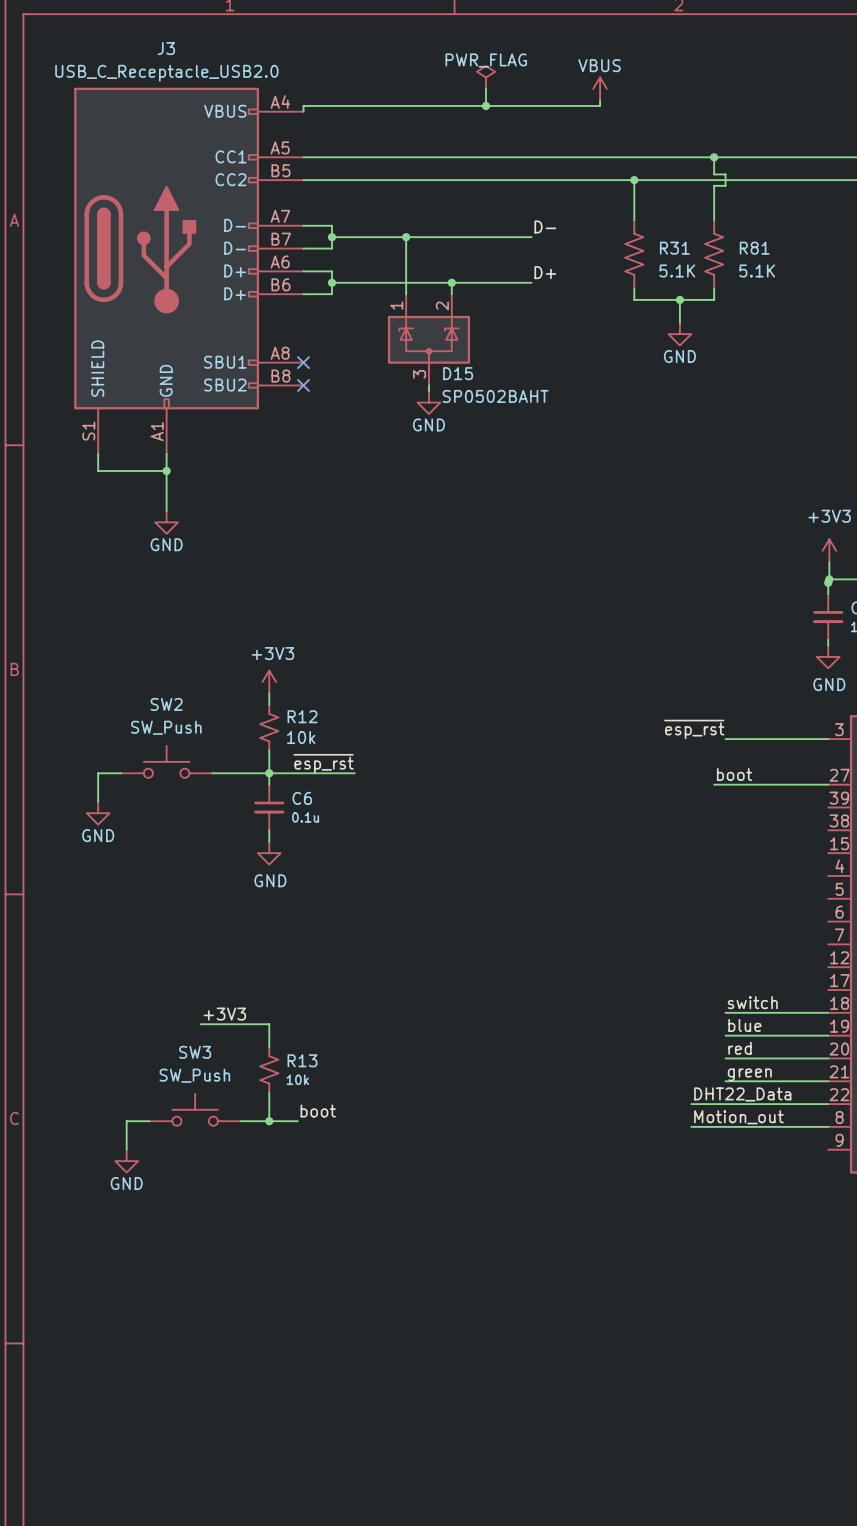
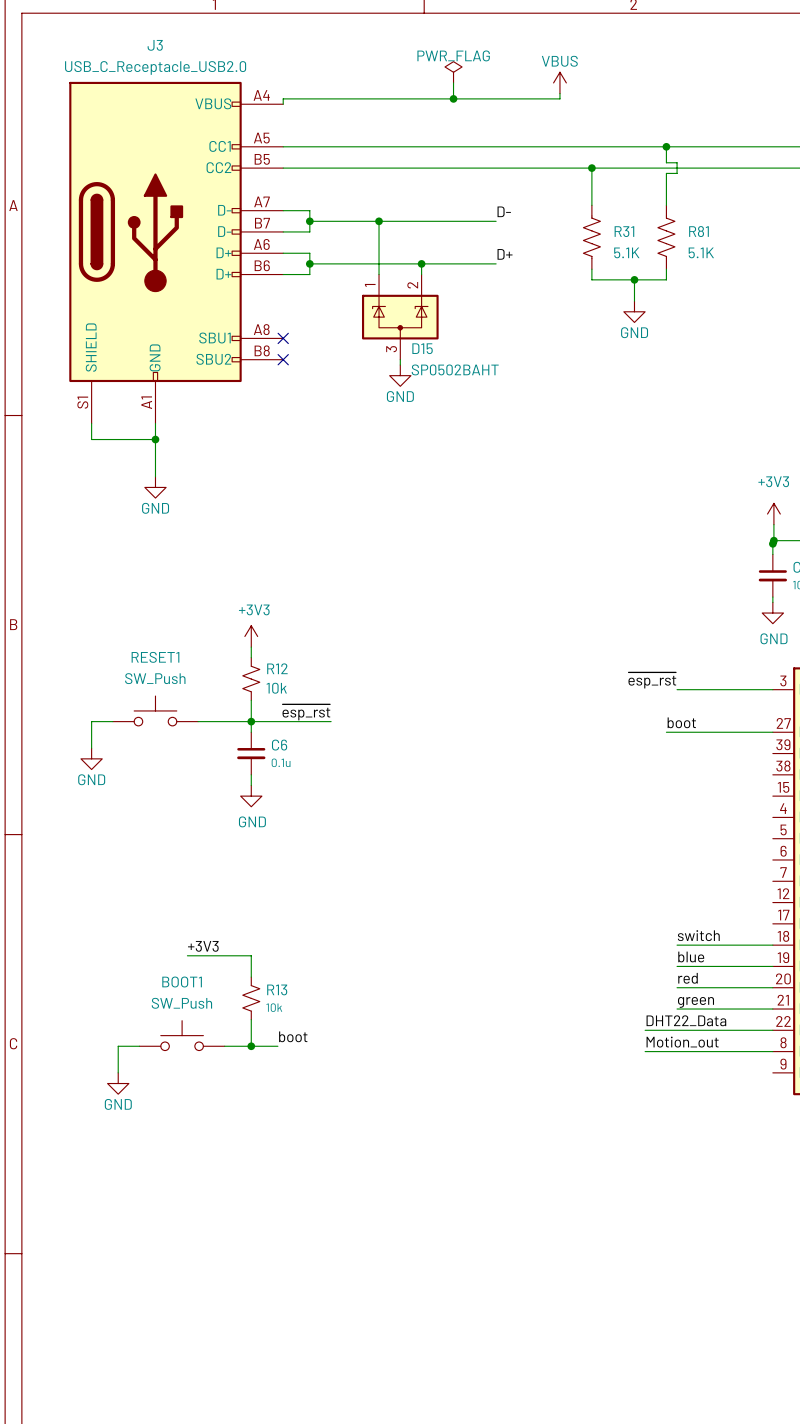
SW2 name: SW2 (166, 704) -> RESET1 (155, 657)
SW3 name: SW3 (195, 1052) -> BOOT1 (182, 982)

